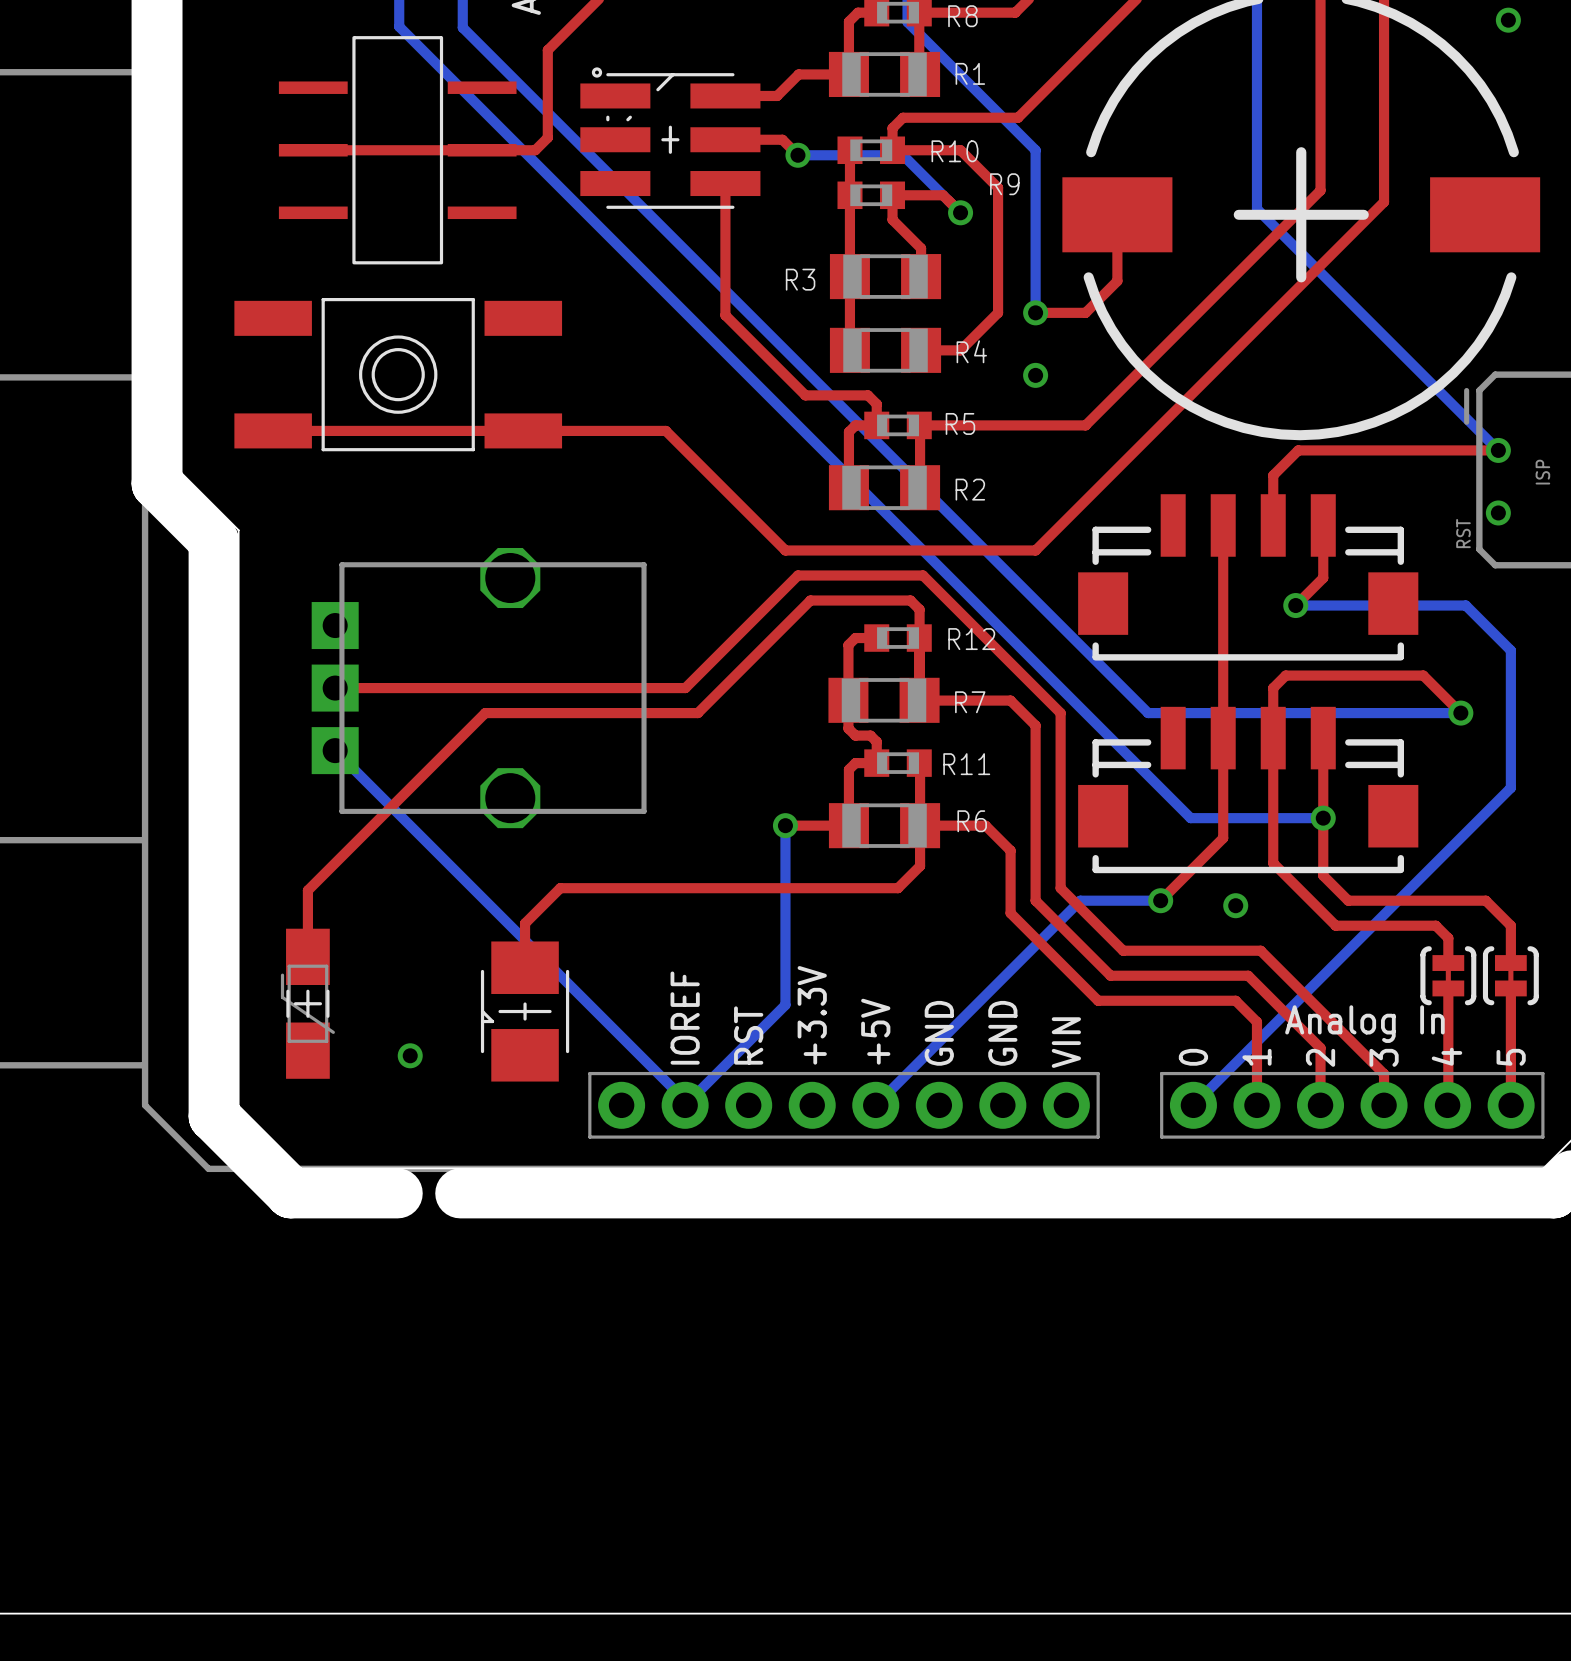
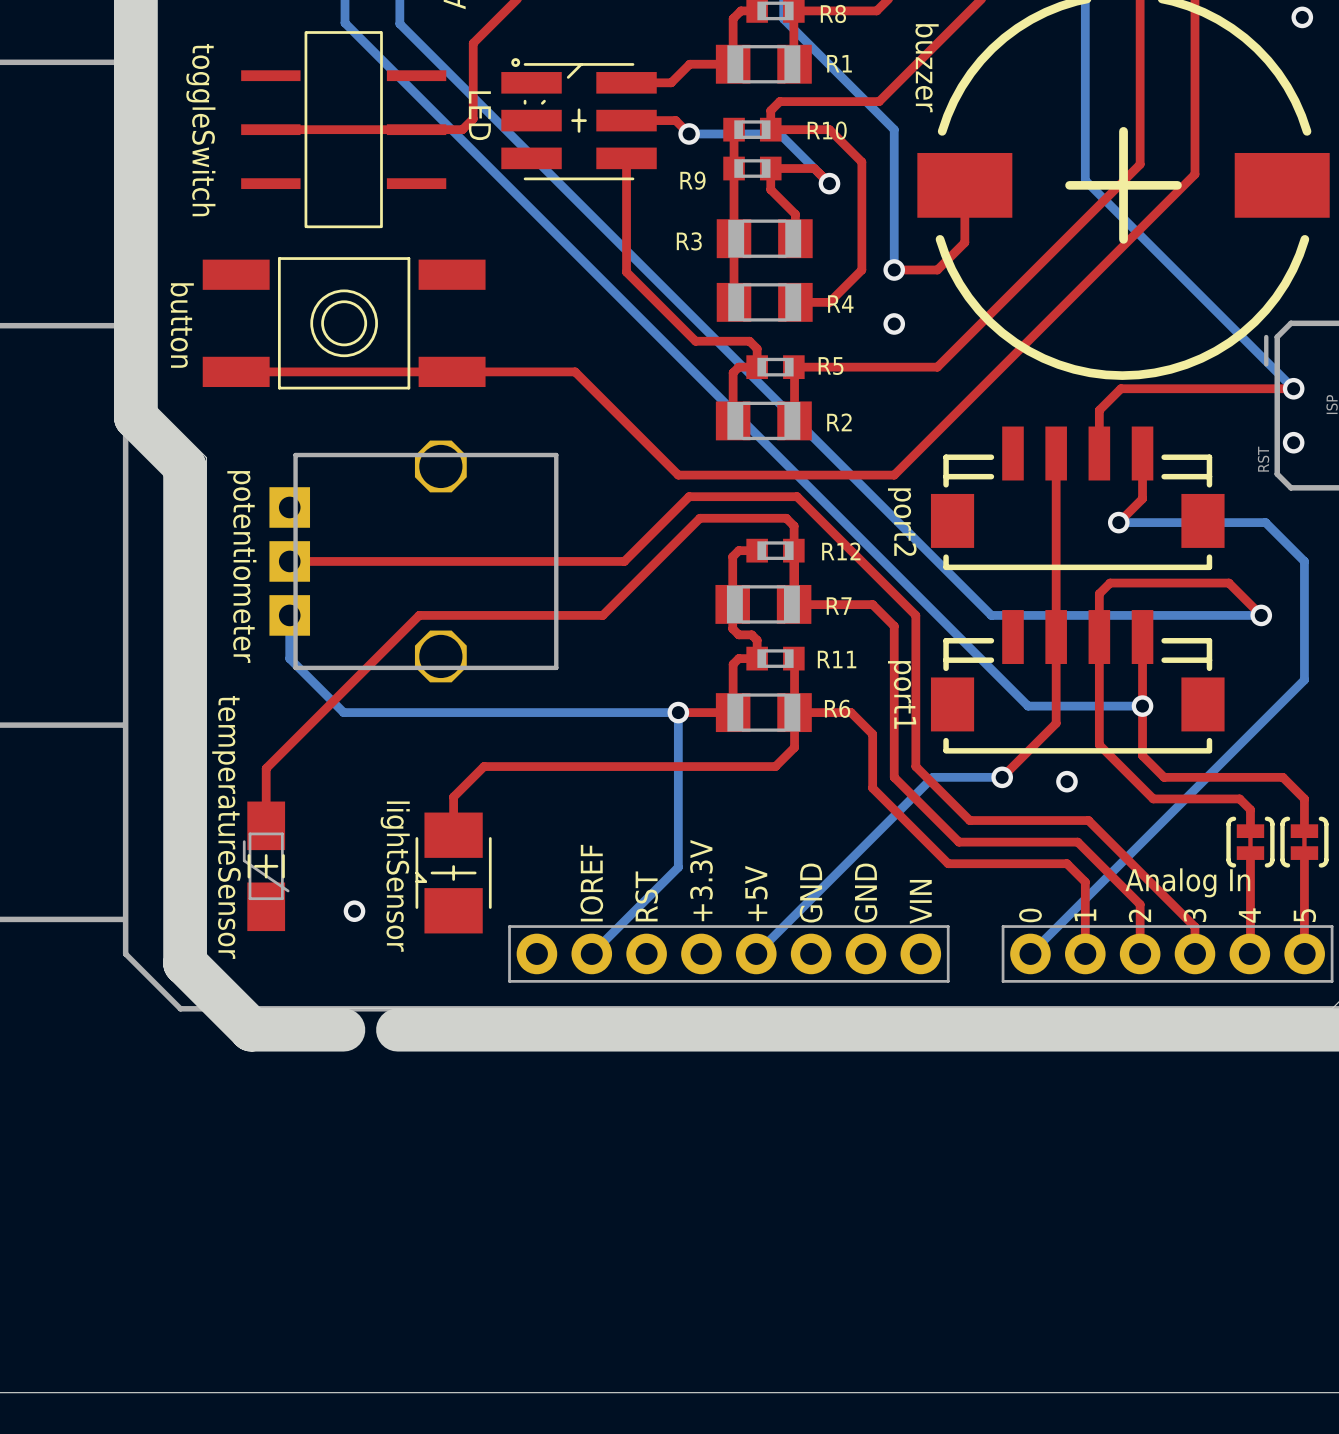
text: none -> buzzer (927, 68)
text: none -> LED (479, 115)
text: none -> toggleSwitch (200, 130)
R9 name position: R9 (1004, 184) -> R9 (692, 180)
text: none -> button (182, 325)
text: none -> port2 (902, 522)
top track: (722, 650) (685, 688) (335, 688) -> (624, 561) (289, 561)
text: none -> potentiometer (241, 567)
part position: (479, 688) -> (413, 561)
bottom track: none -> (289, 615) (289, 658) (343, 712) (678, 712)
bottom track: (335, 750) (685, 1100) -> none
text: none -> port1 (902, 694)
text: none -> temperatureSensor (226, 827)
text: none -> lightSensor (395, 876)

